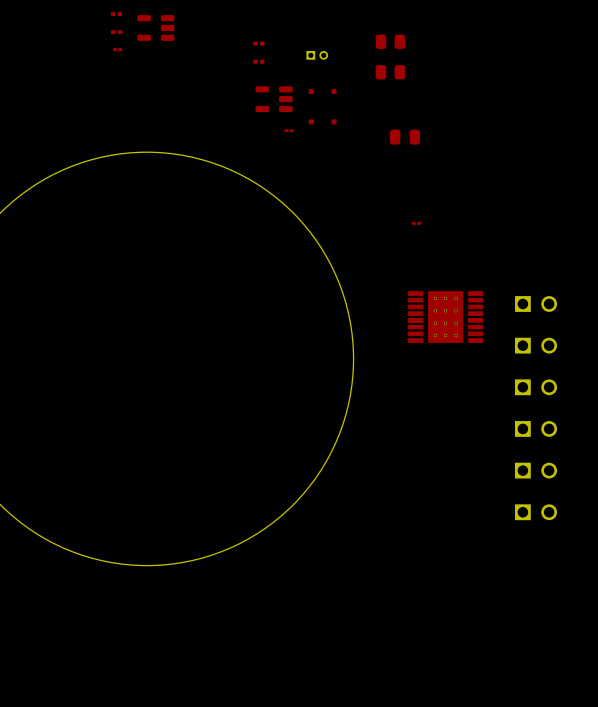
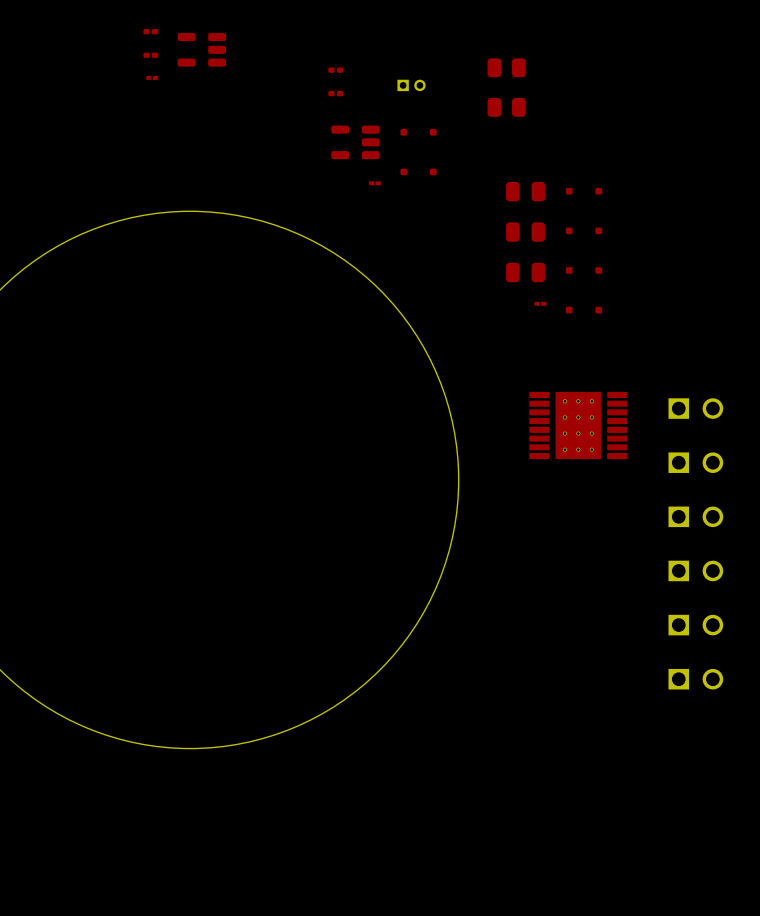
part: none -> (583, 191)
part: none -> (583, 230)
part: none -> (525, 232)
part: none -> (583, 270)
part: none -> (525, 272)
part: none -> (583, 310)

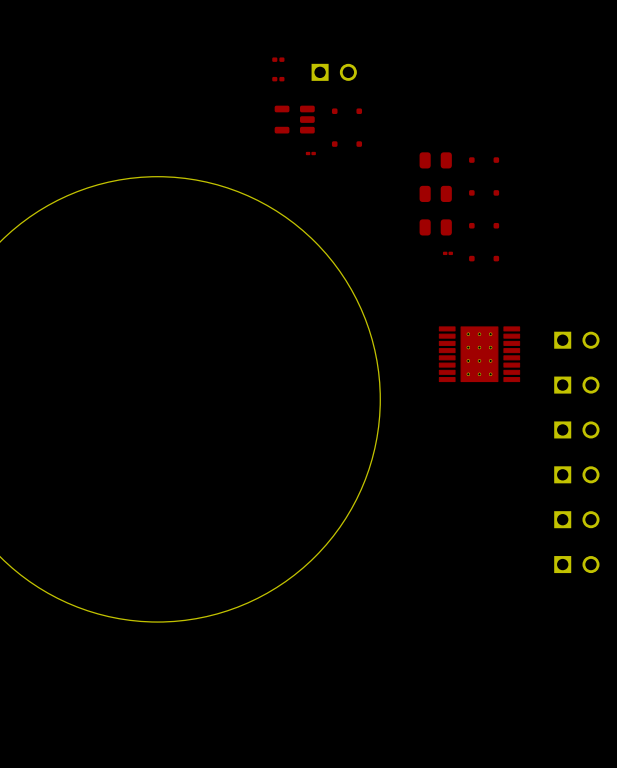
part: (150, 31) -> none
part: (201, 49) -> none
part: (150, 55) -> none
part: (506, 67) -> none
part: (152, 78) -> none
part footprint: [397, 79, 426, 92] -> [311, 63, 357, 81]
part: (506, 107) -> none

